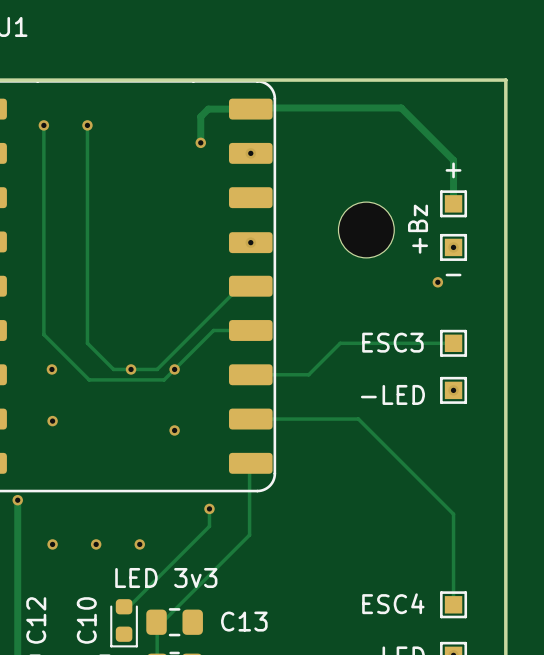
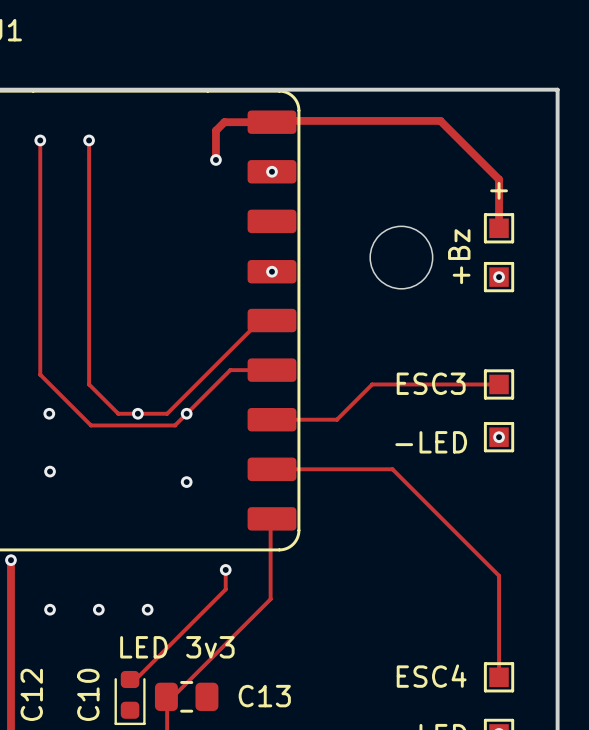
text: - (453, 275) -> none
via: (437, 282) -> none

